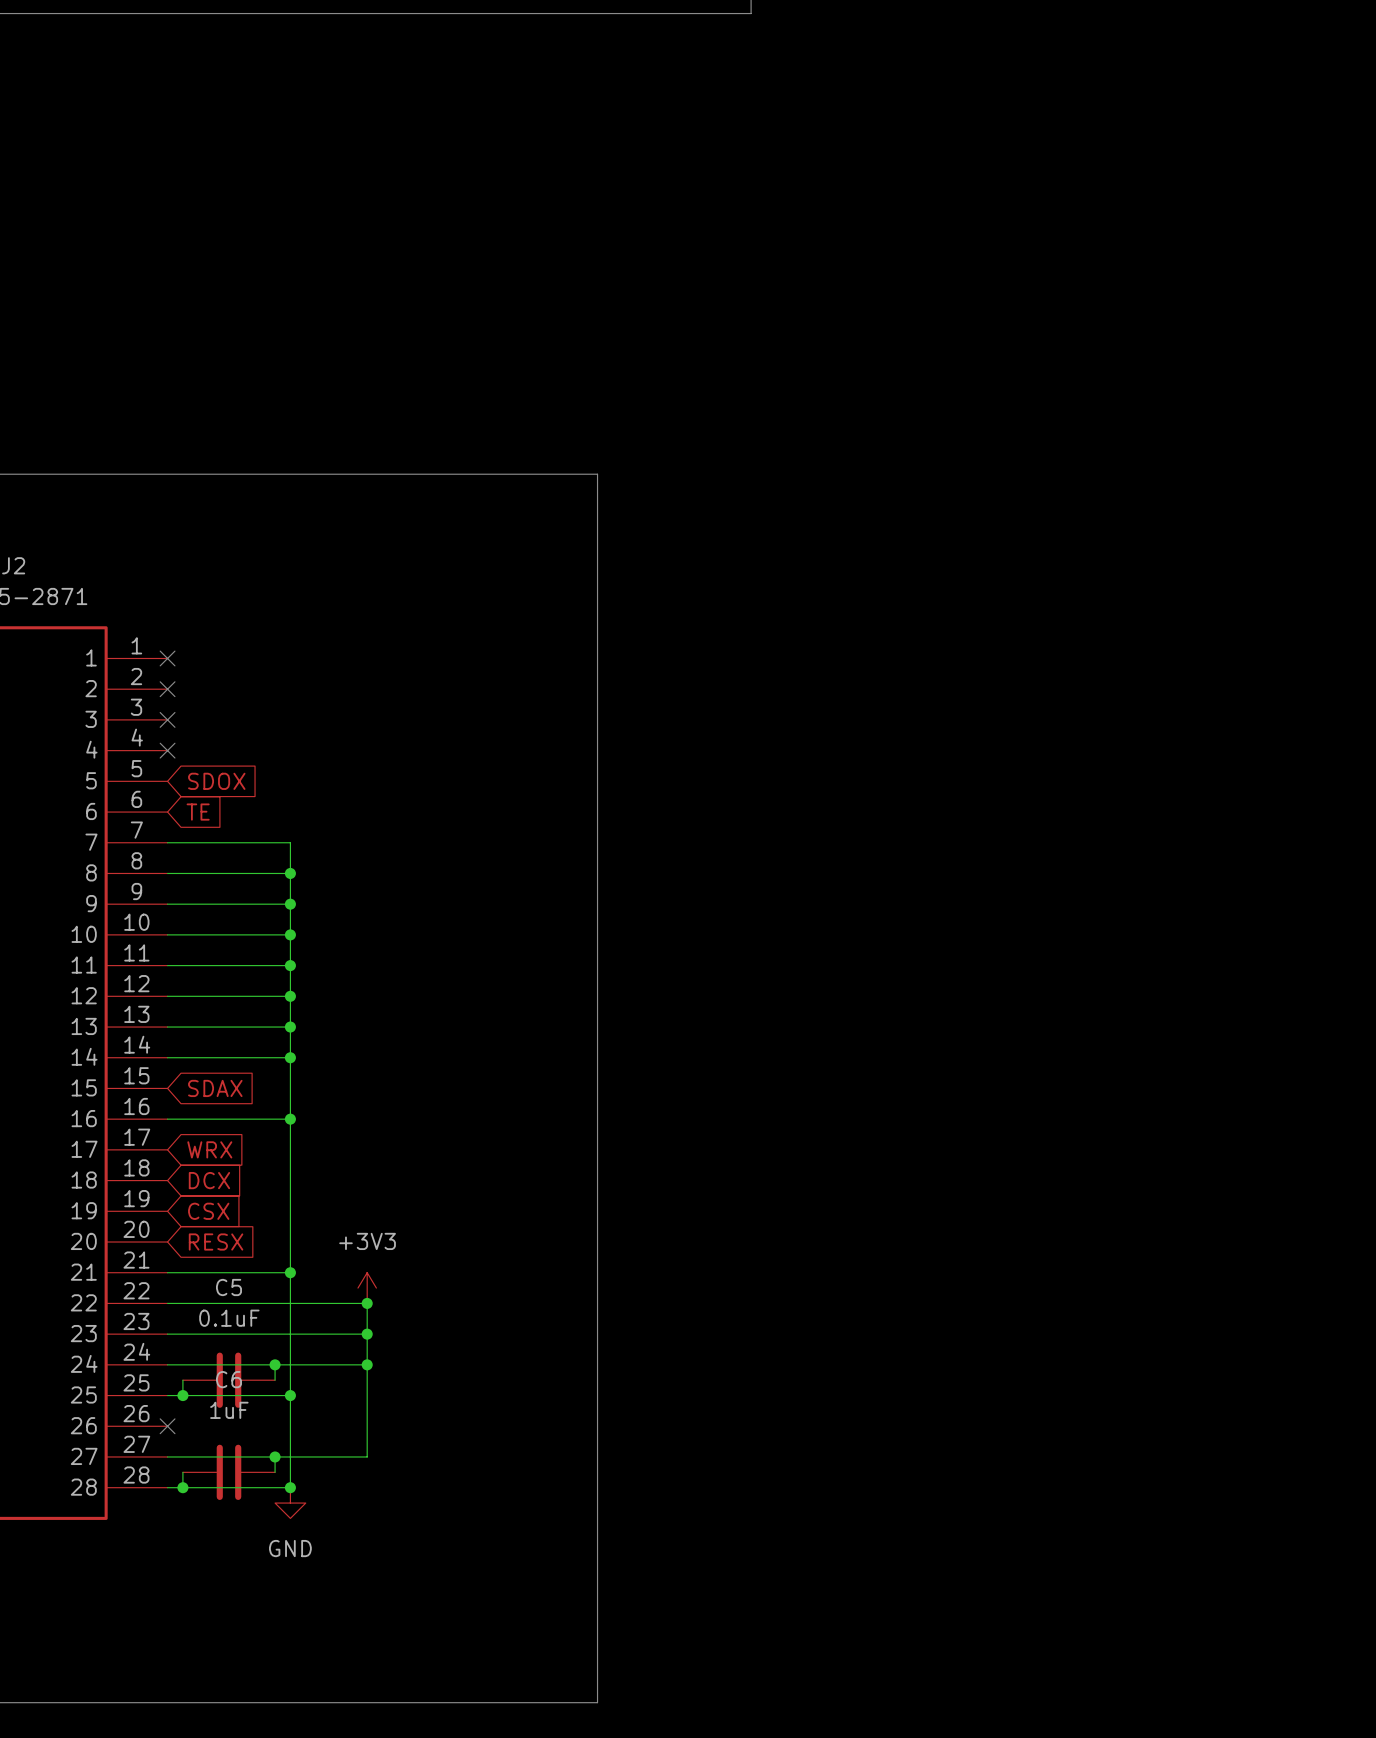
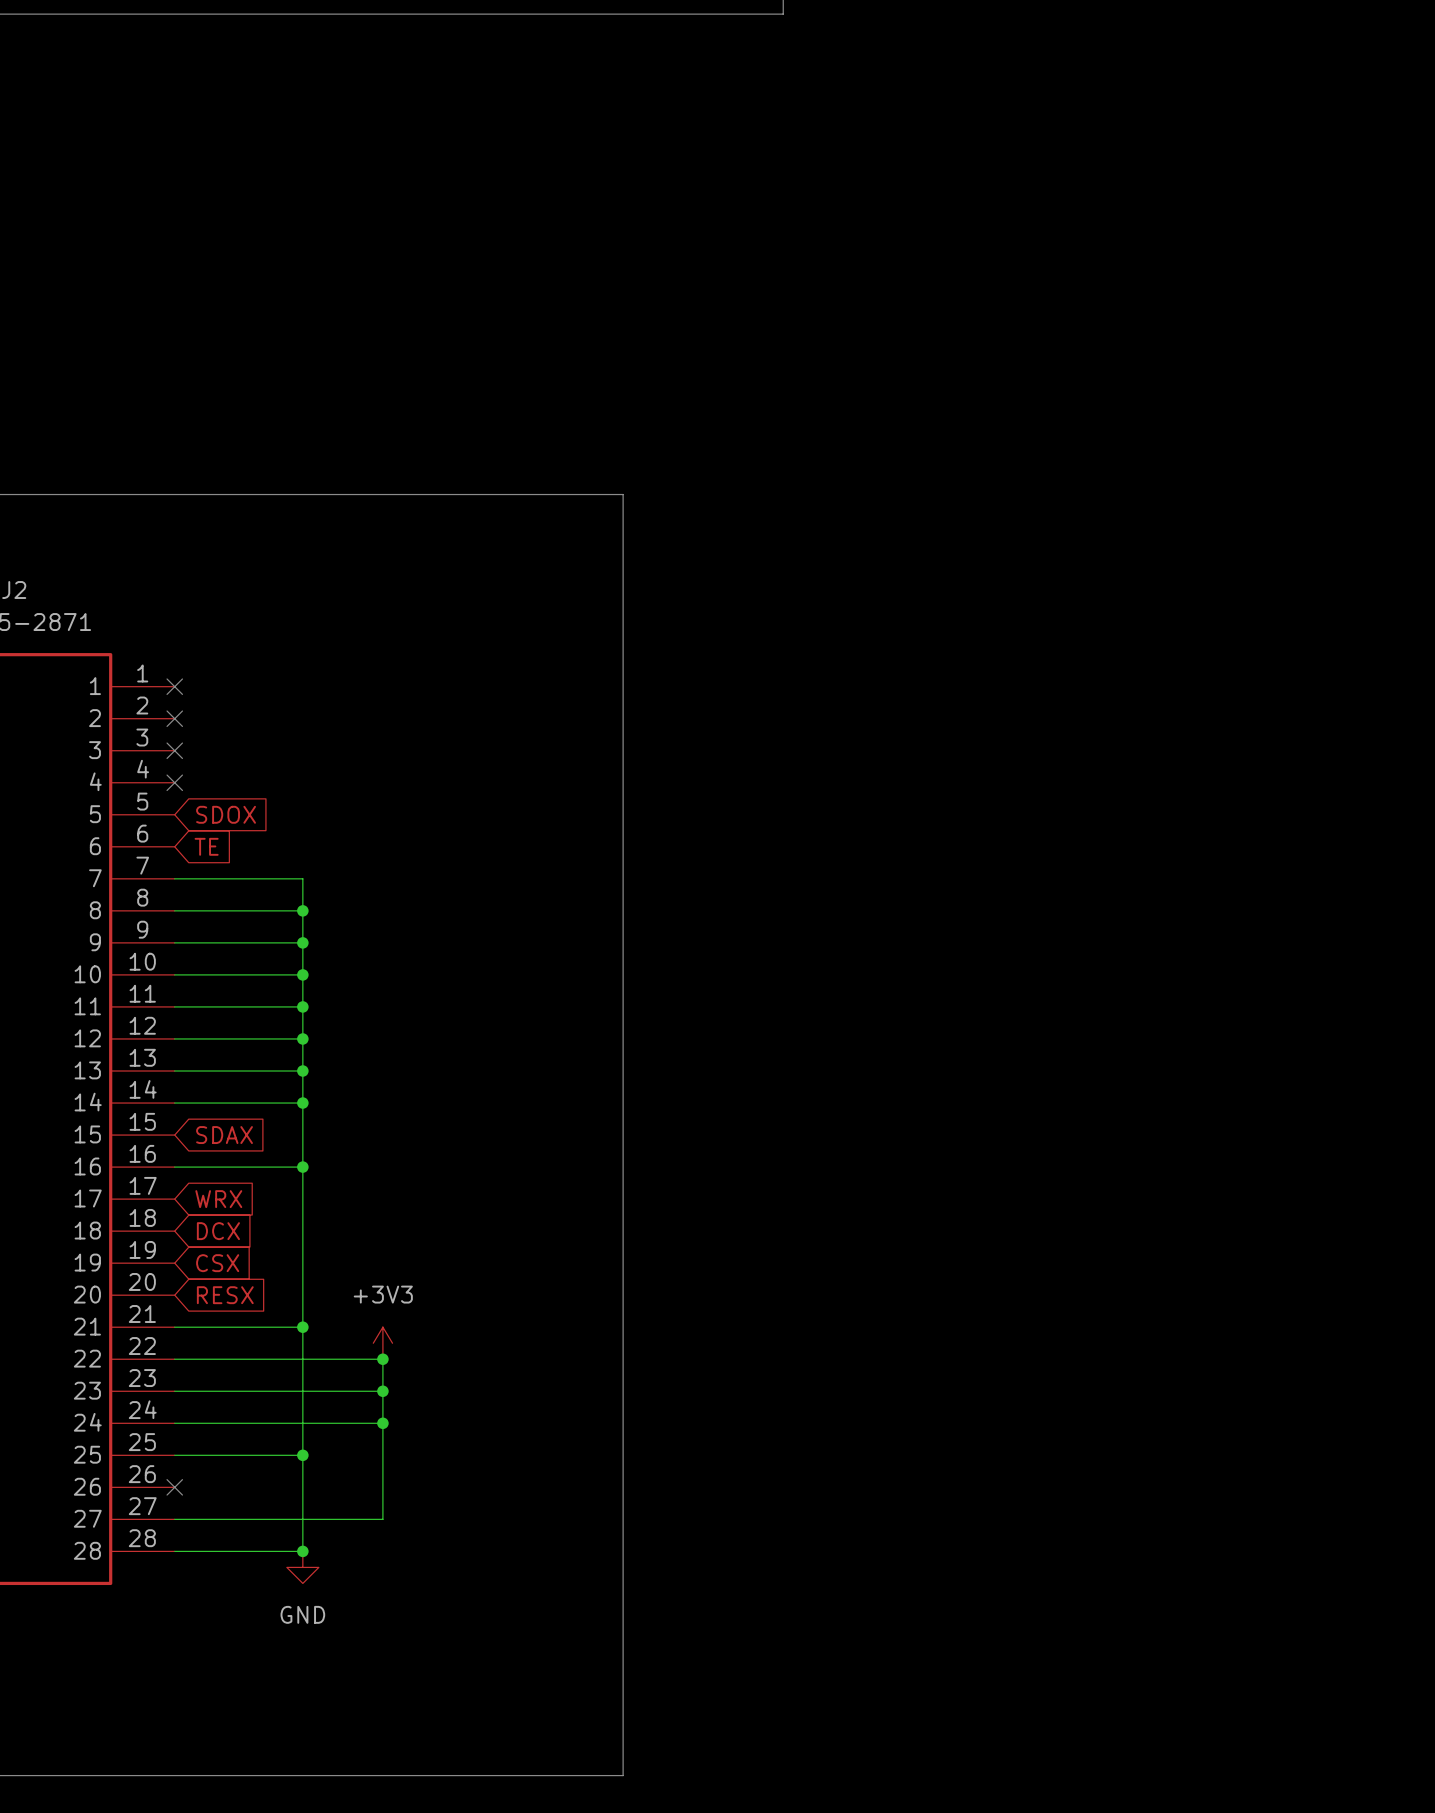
wire: (275, 1364) (275, 1380) -> none
junction: (275, 1364) -> none
wire: (182, 1380) (182, 1395) -> none
C5: 0.1uF (228, 1380) -> none
junction: (182, 1395) -> none
wire: (275, 1456) (275, 1472) -> none
junction: (275, 1456) -> none
wire: (182, 1472) (182, 1487) -> none
C6: 1uF (228, 1472) -> none
junction: (182, 1487) -> none

